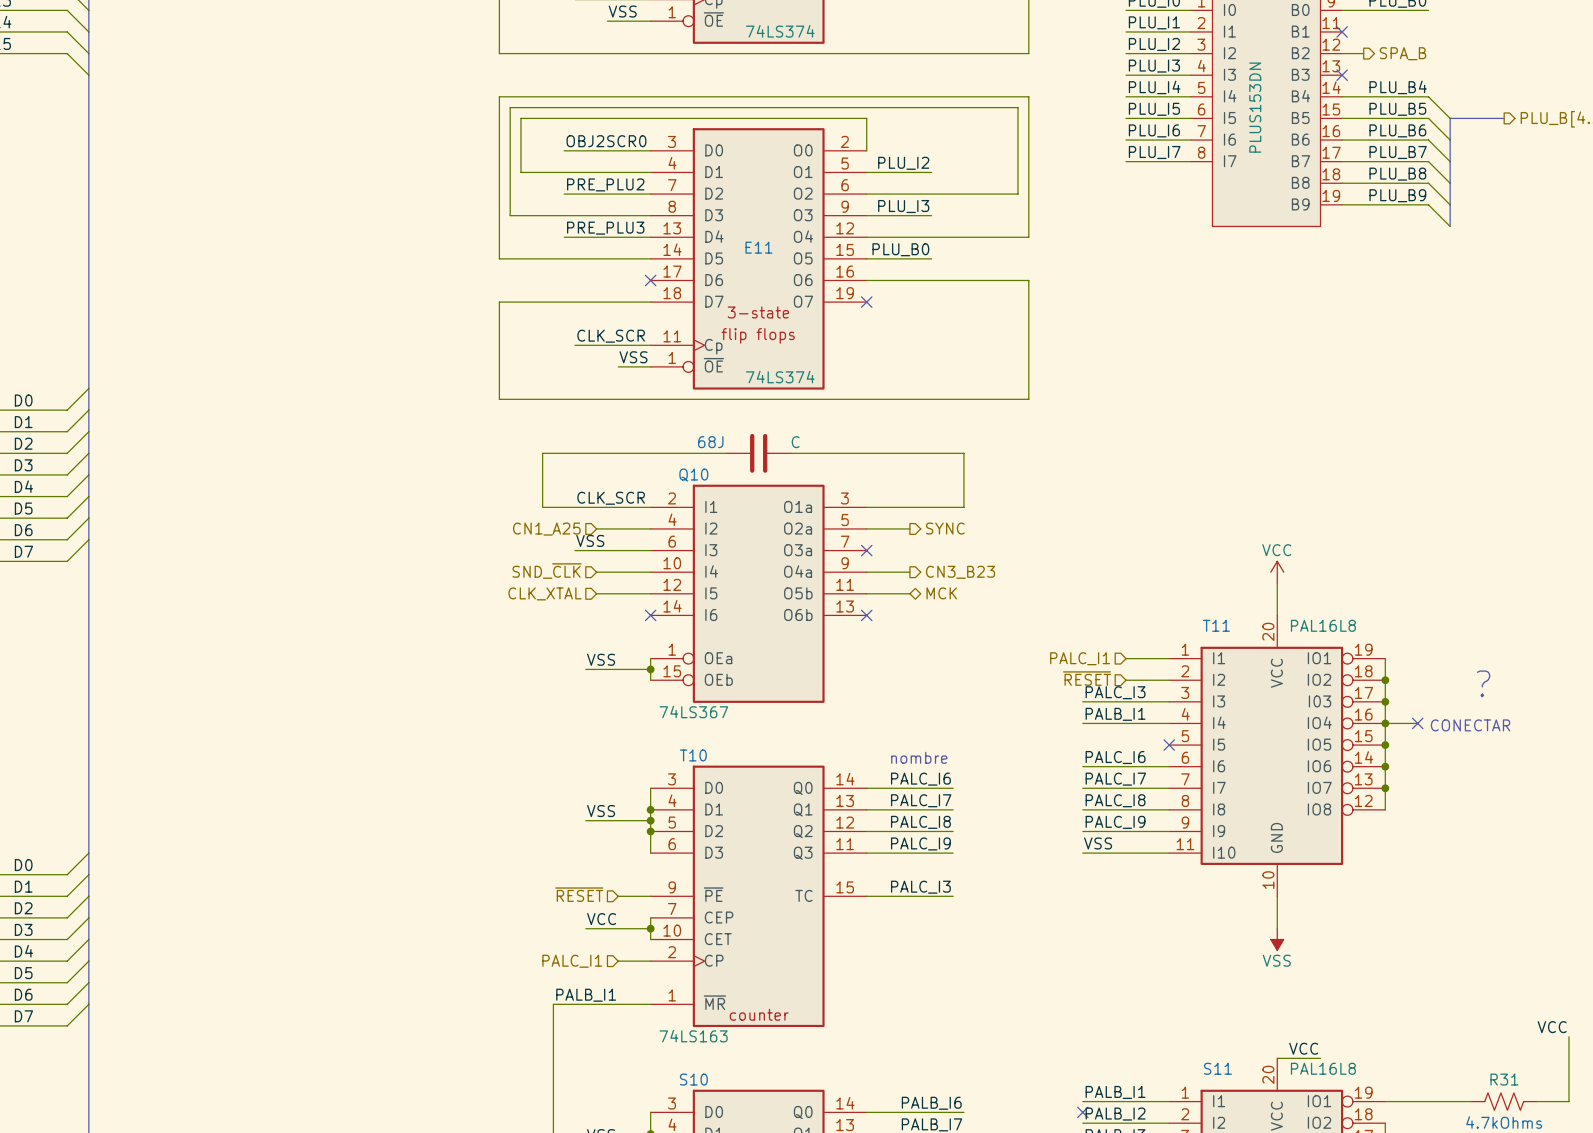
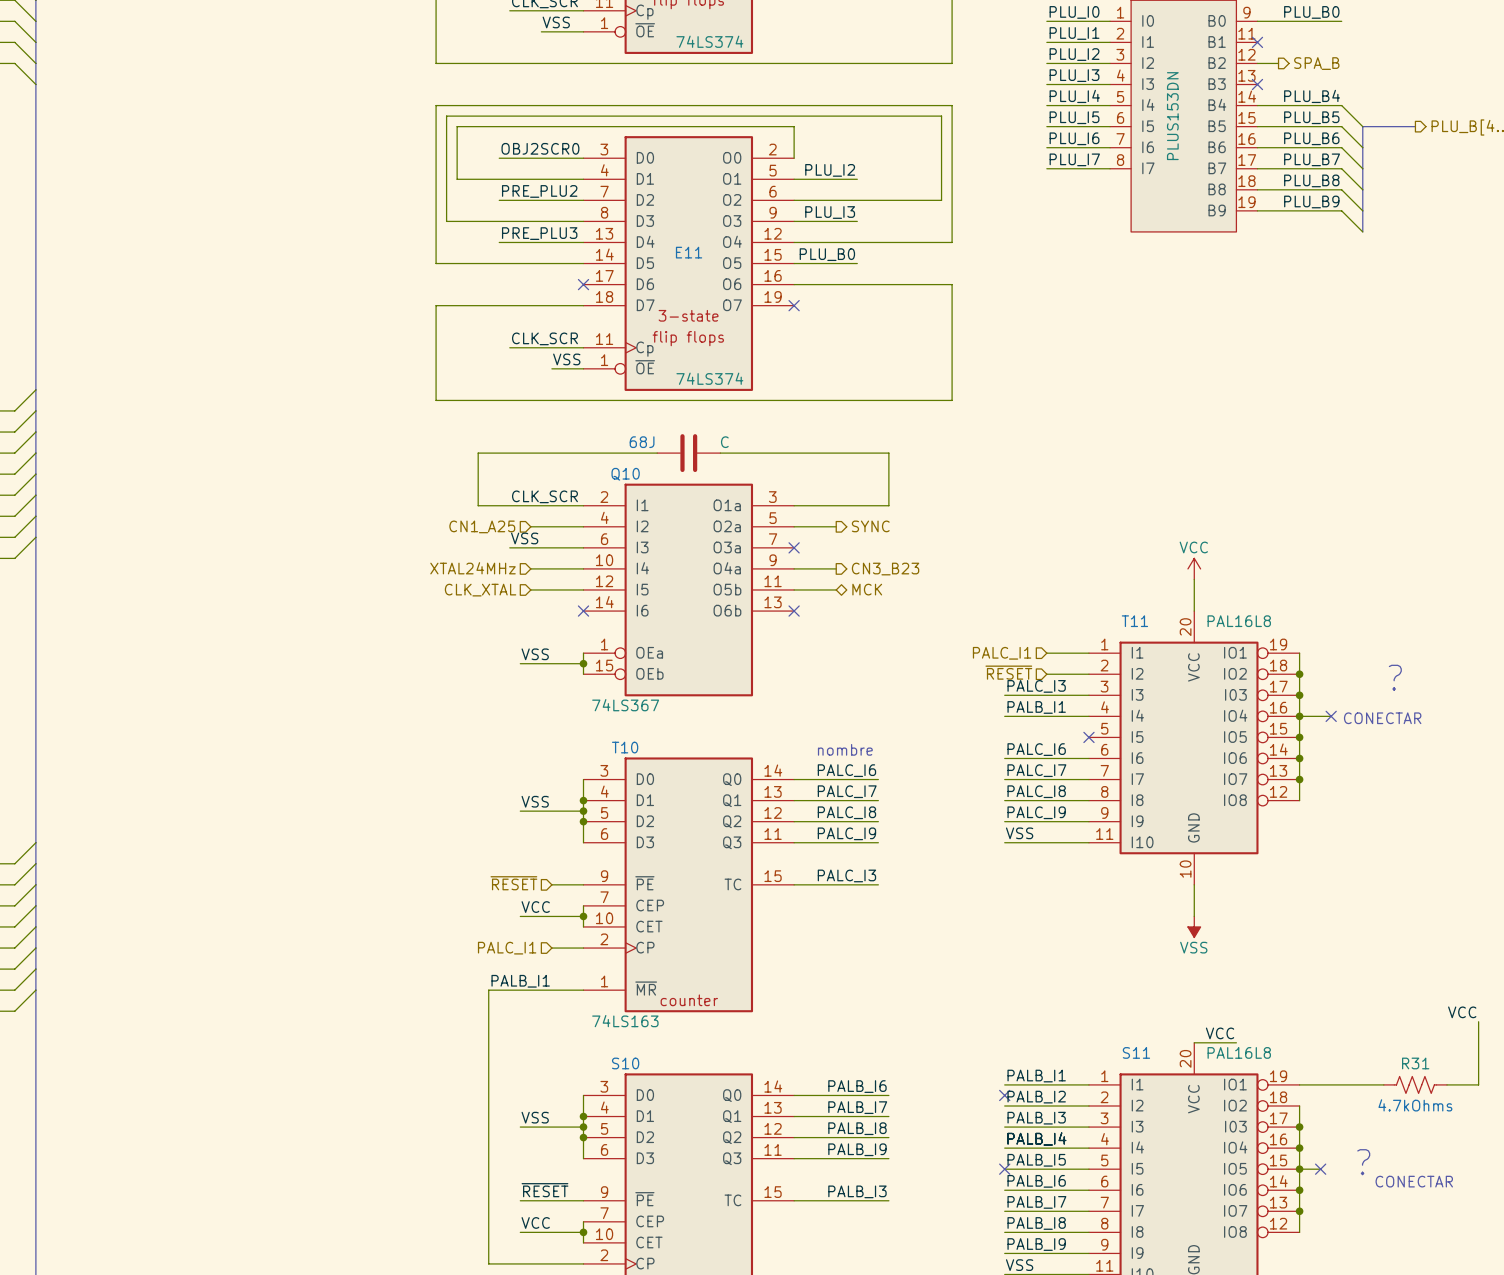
hierarchical label: SND_~{CLK} (547, 571) -> XTAL24MHz (473, 568)

